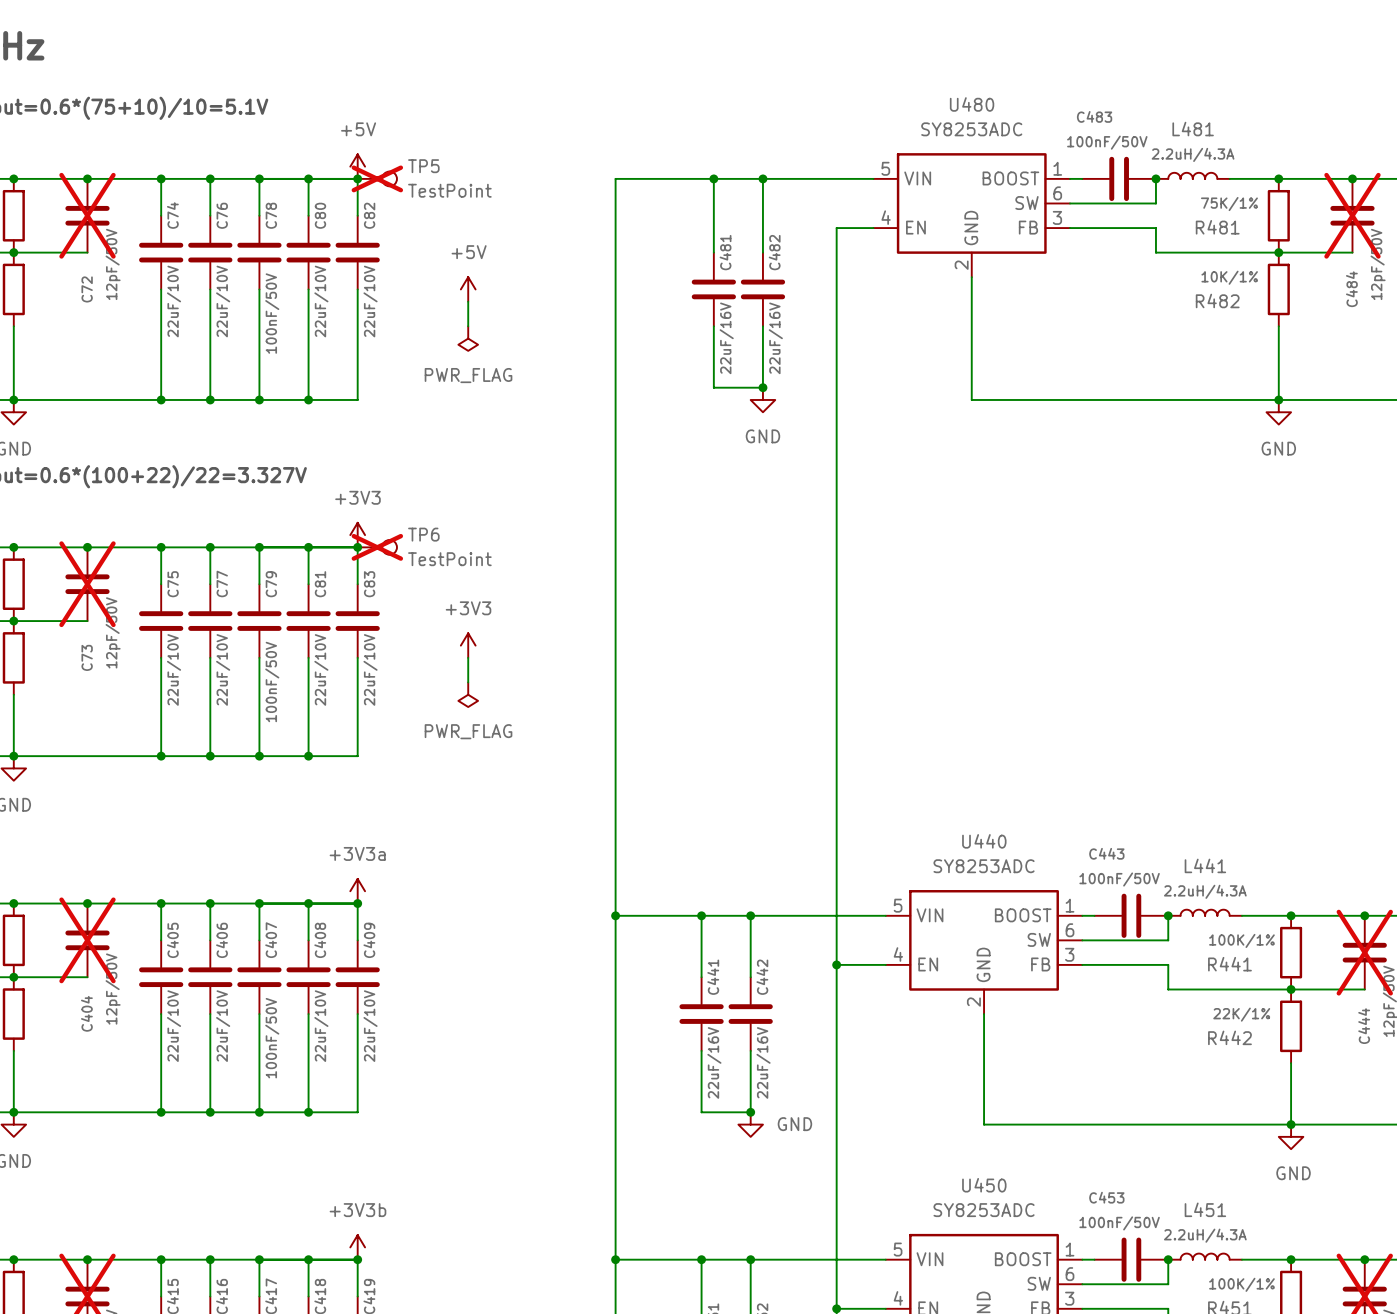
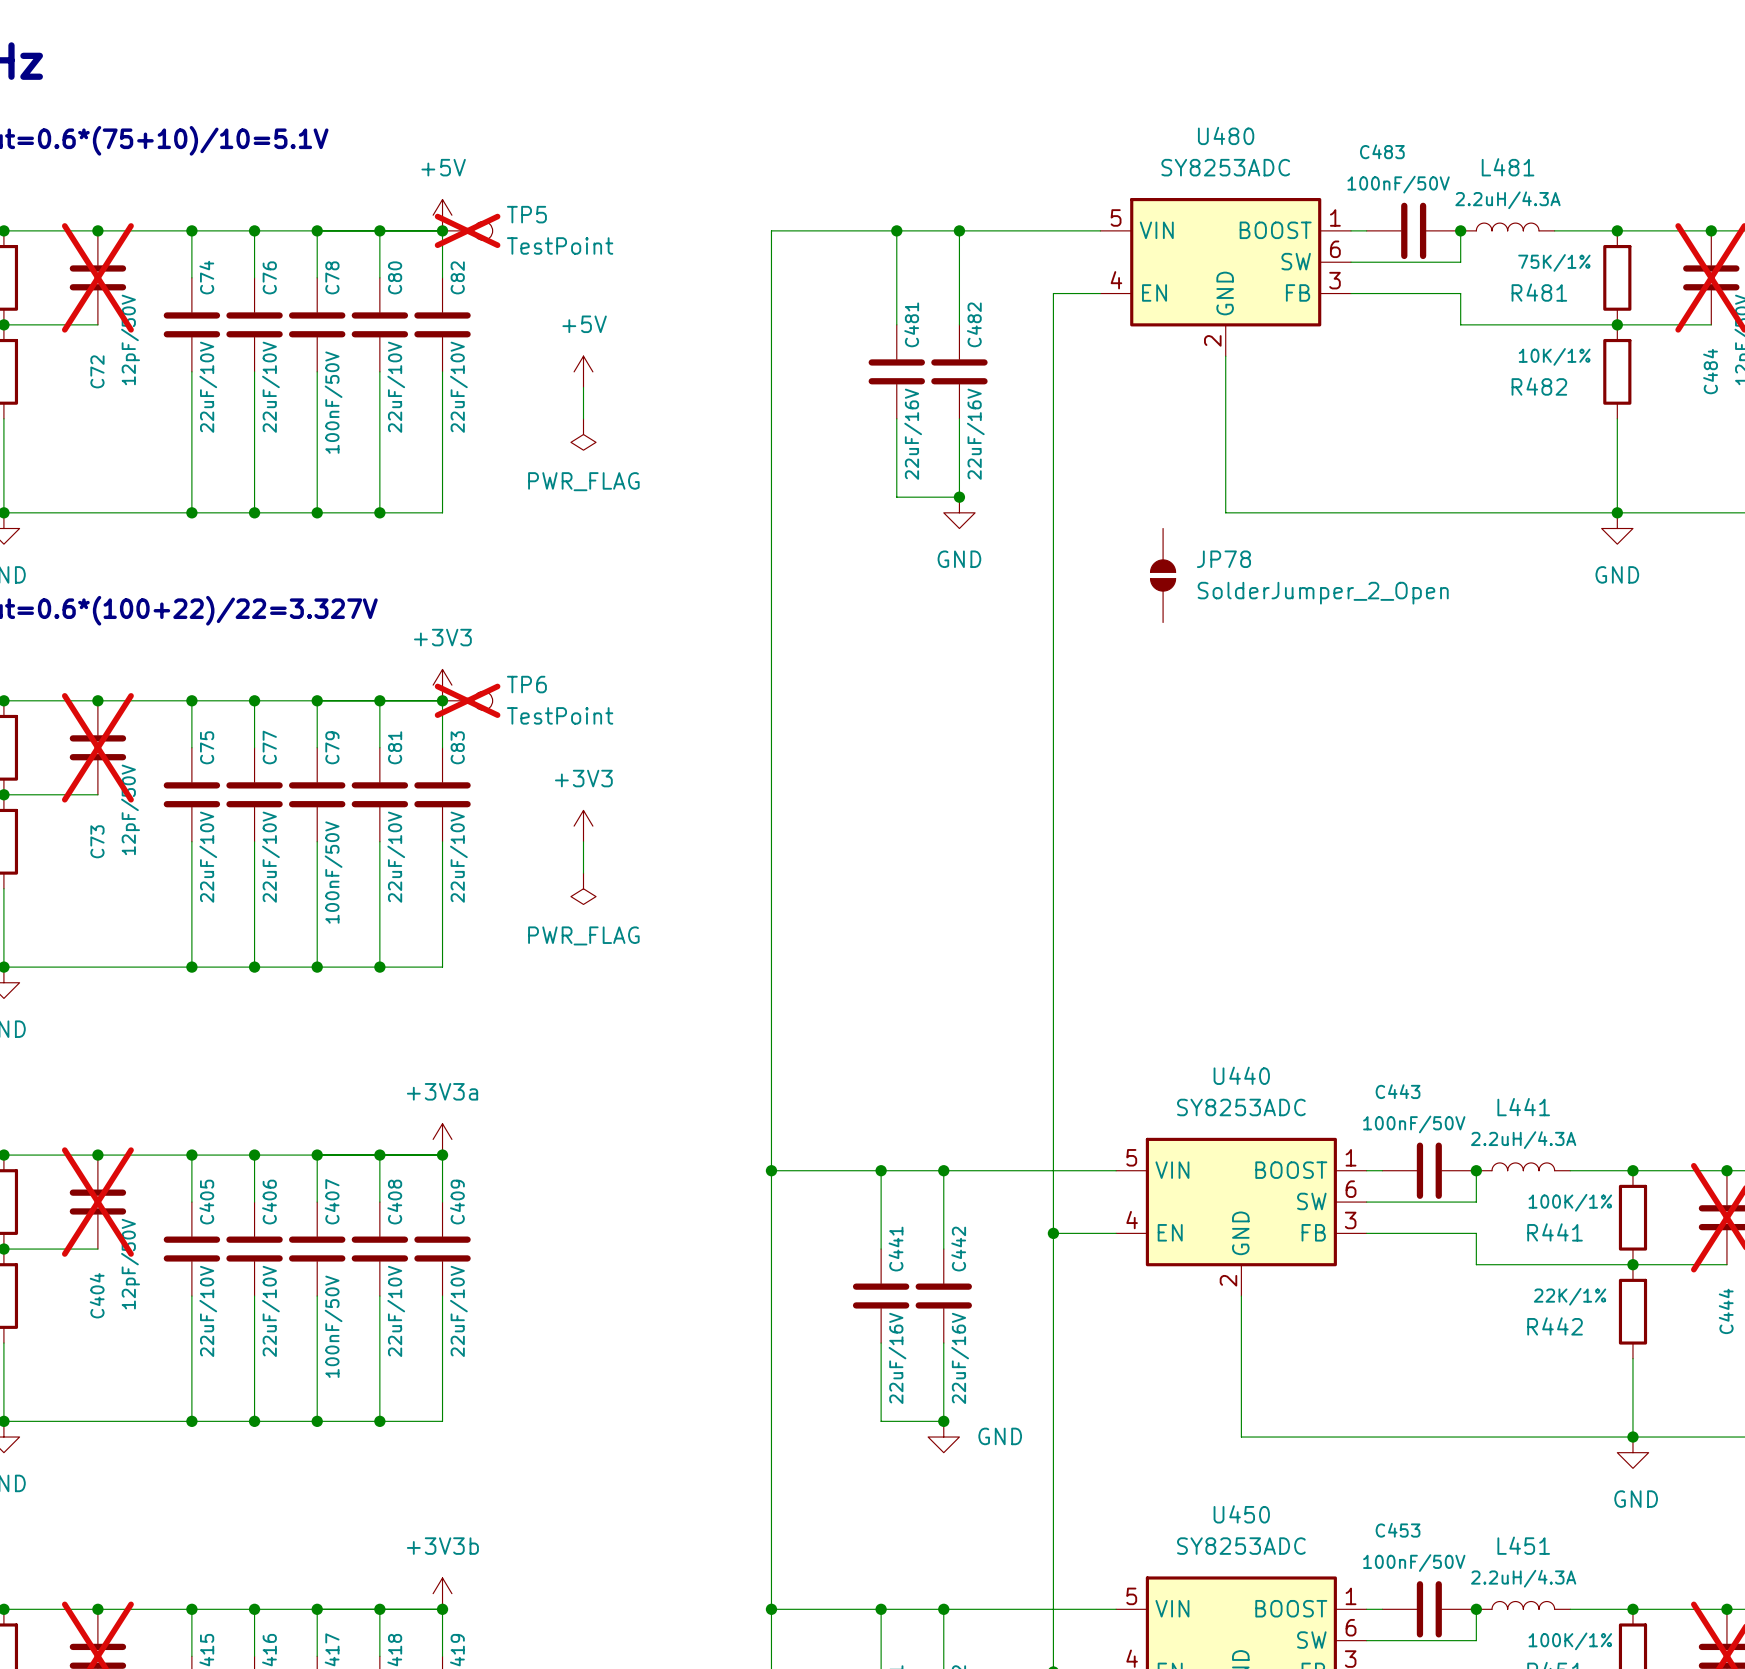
JP78: none -> SolderJumper_2_Open (1163, 575)

